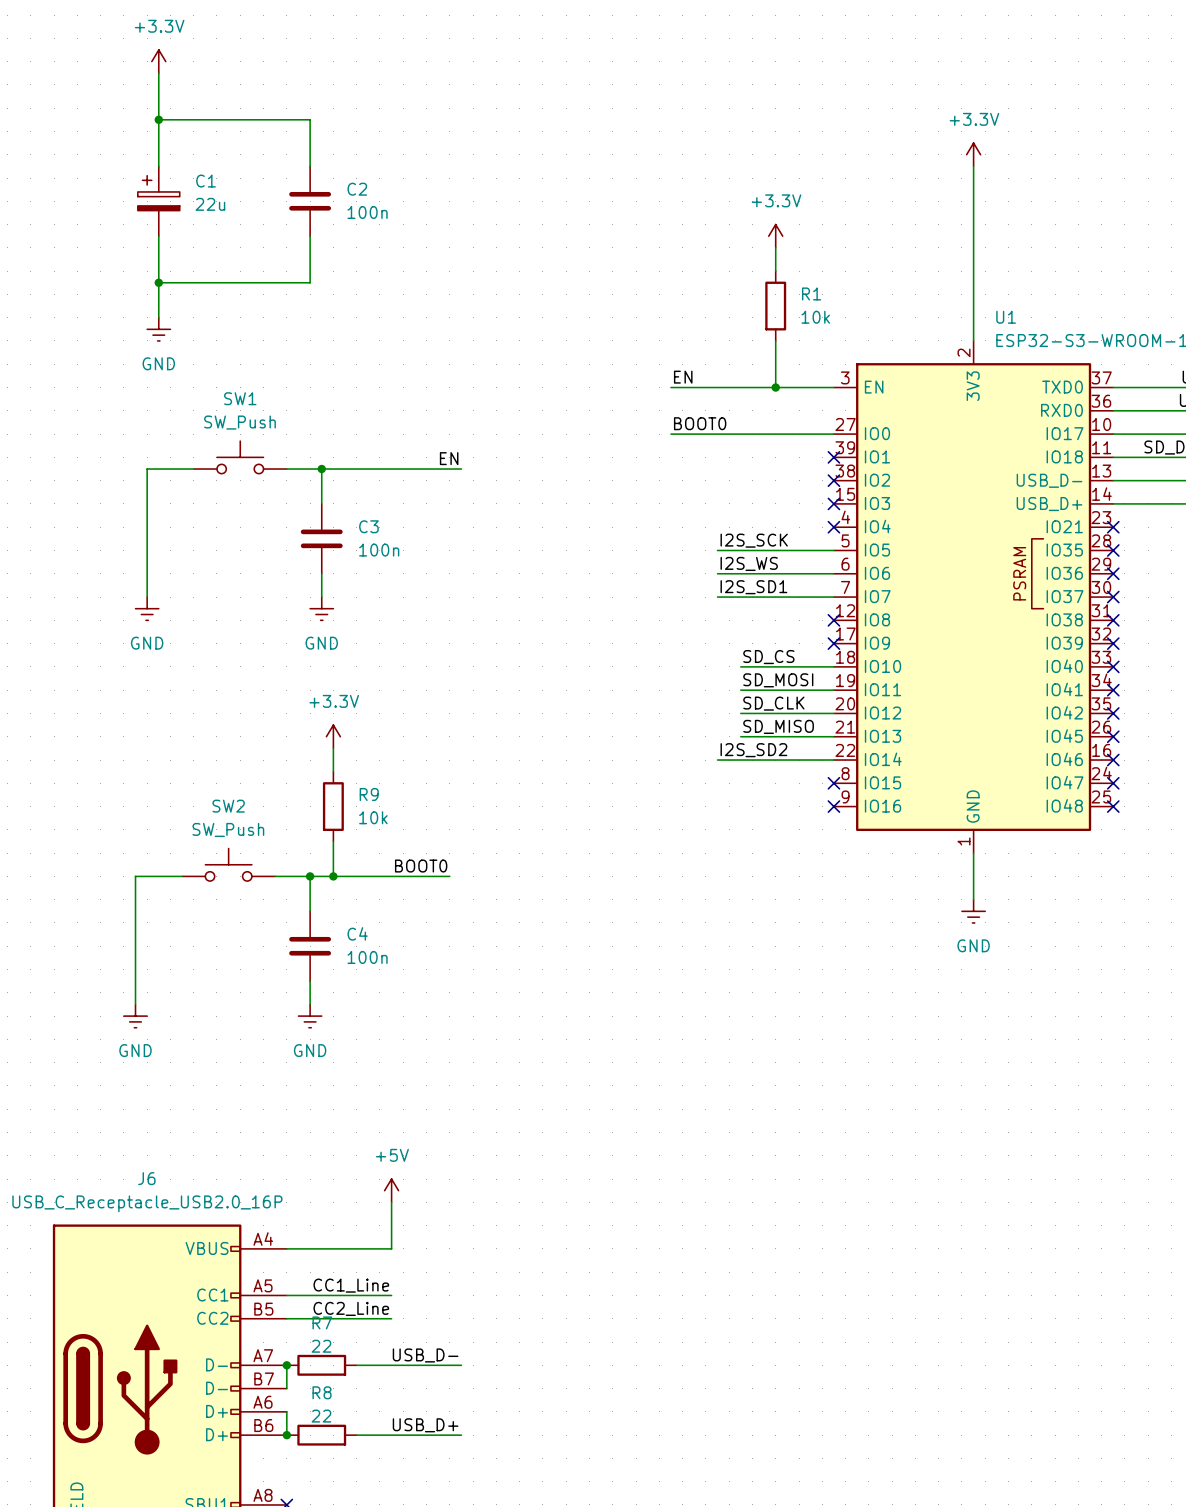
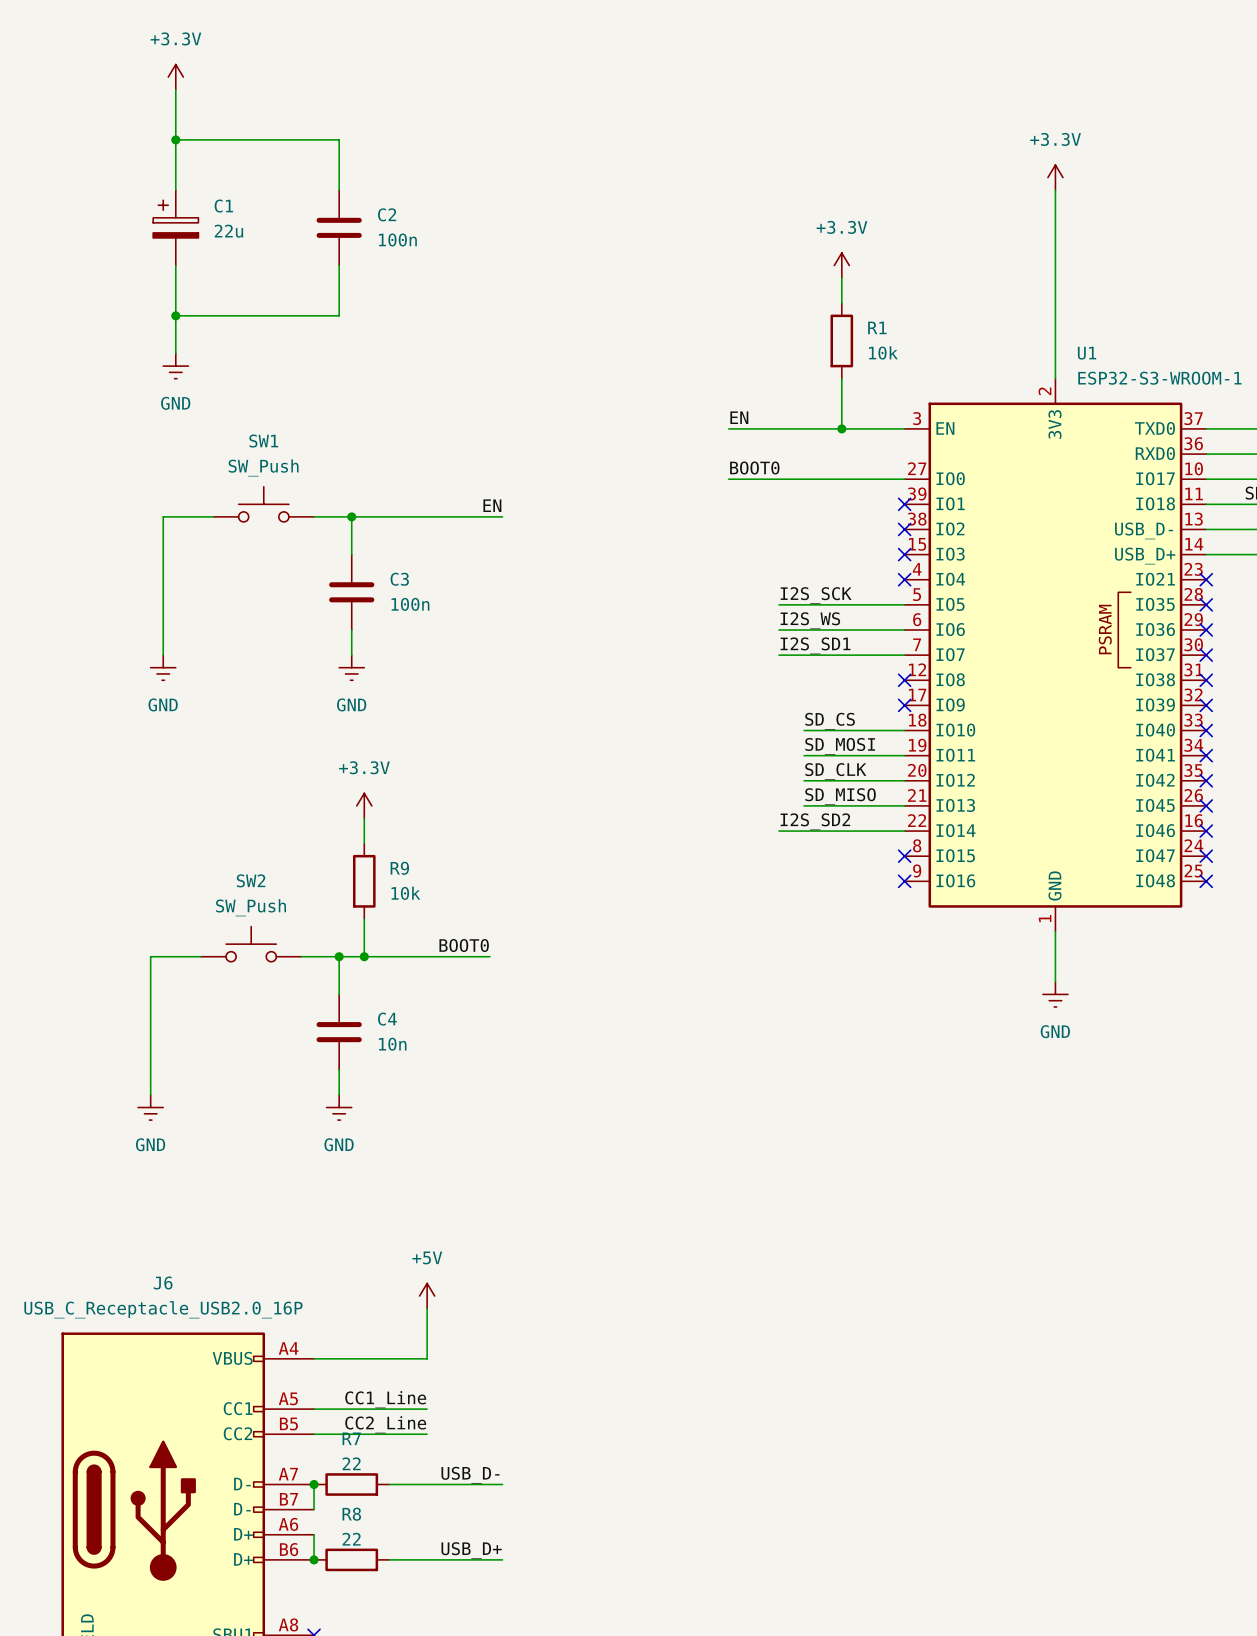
C4 value: 100n (367, 957) -> 10n (392, 1044)

